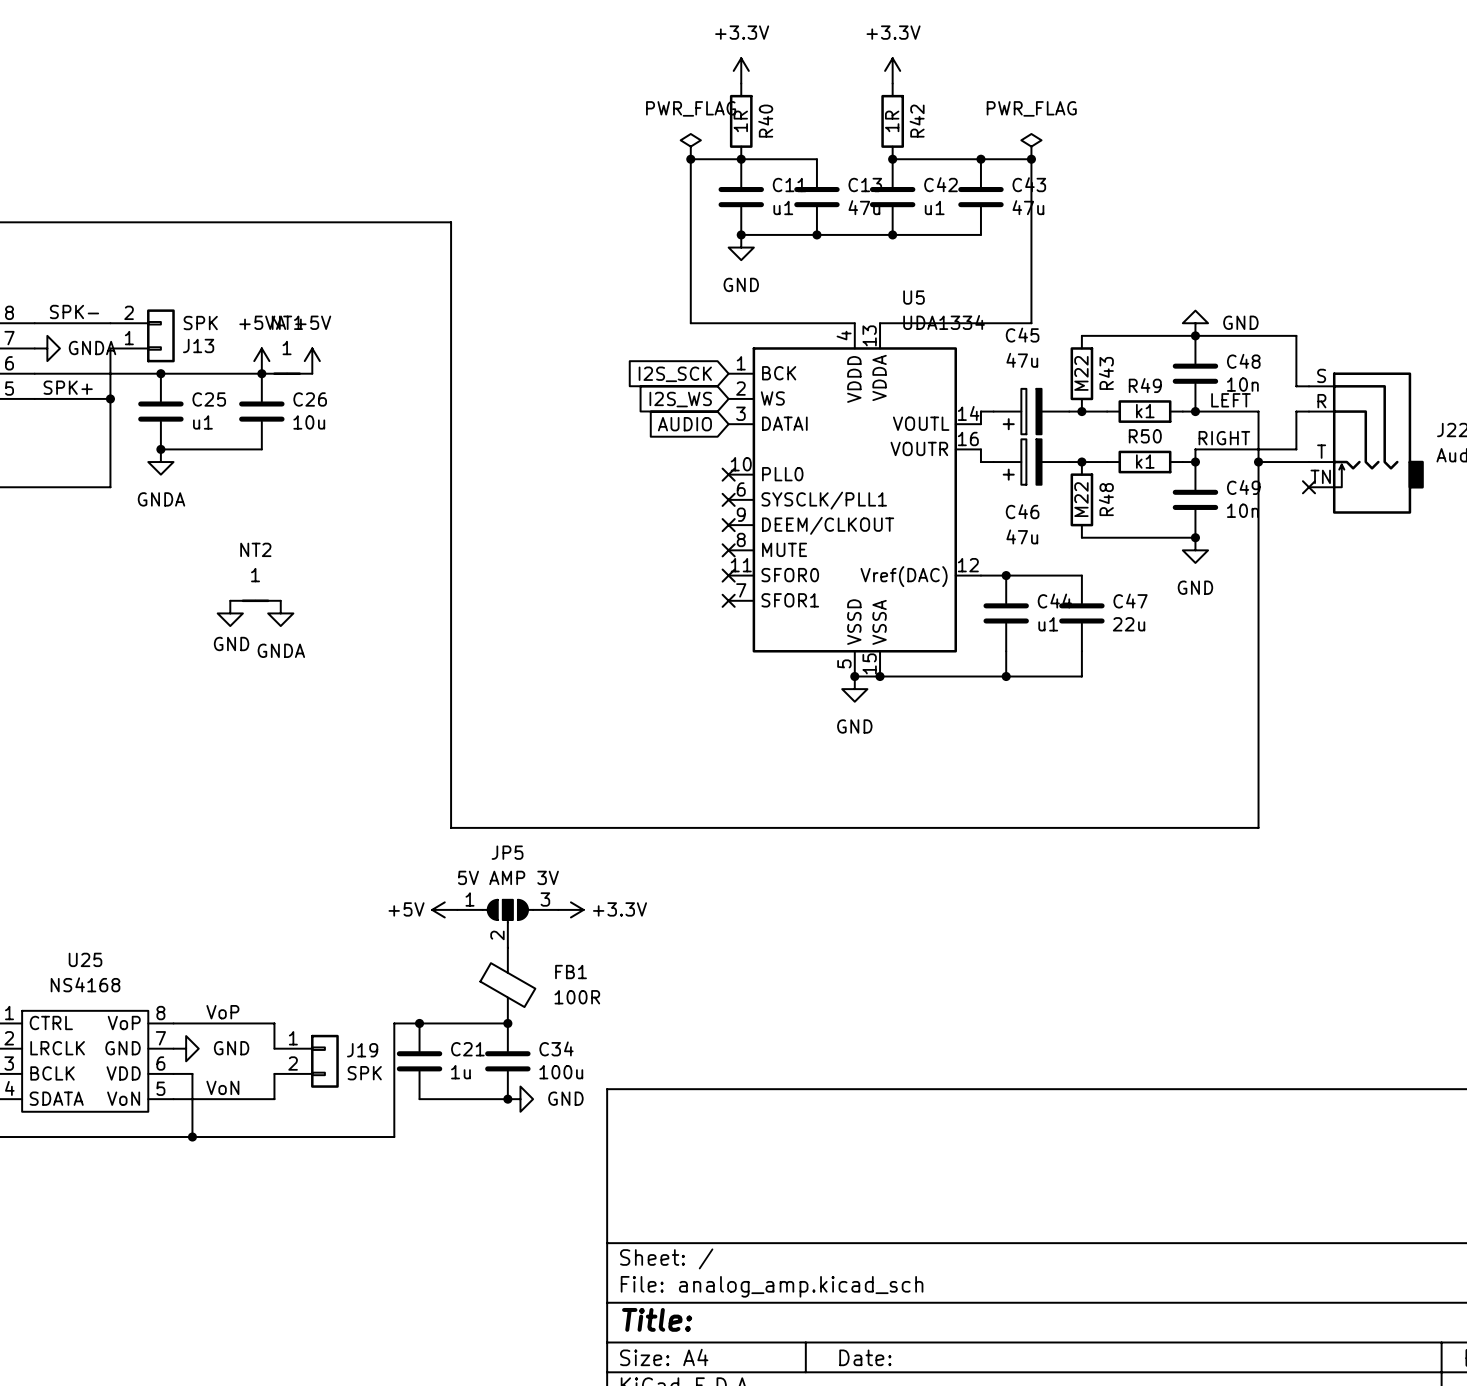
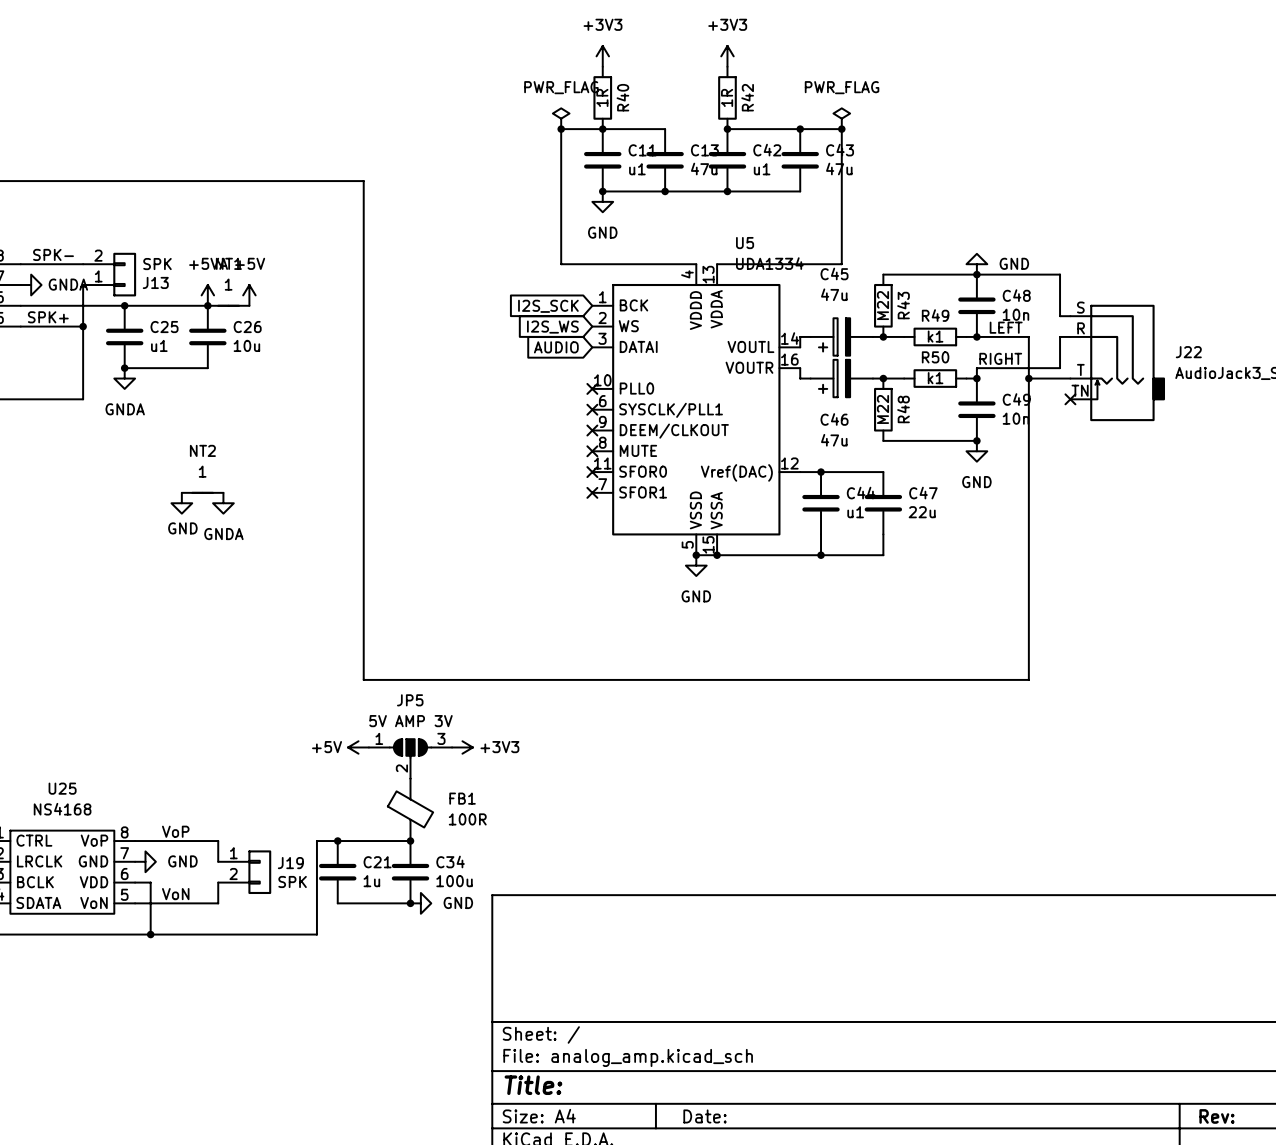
power symbol: +3.3V (741, 70) -> +3V3 (602, 56)
power symbol: +3.3V (892, 70) -> +3V3 (727, 56)
power symbol: +3.3V (570, 909) -> +3V3 (462, 747)

